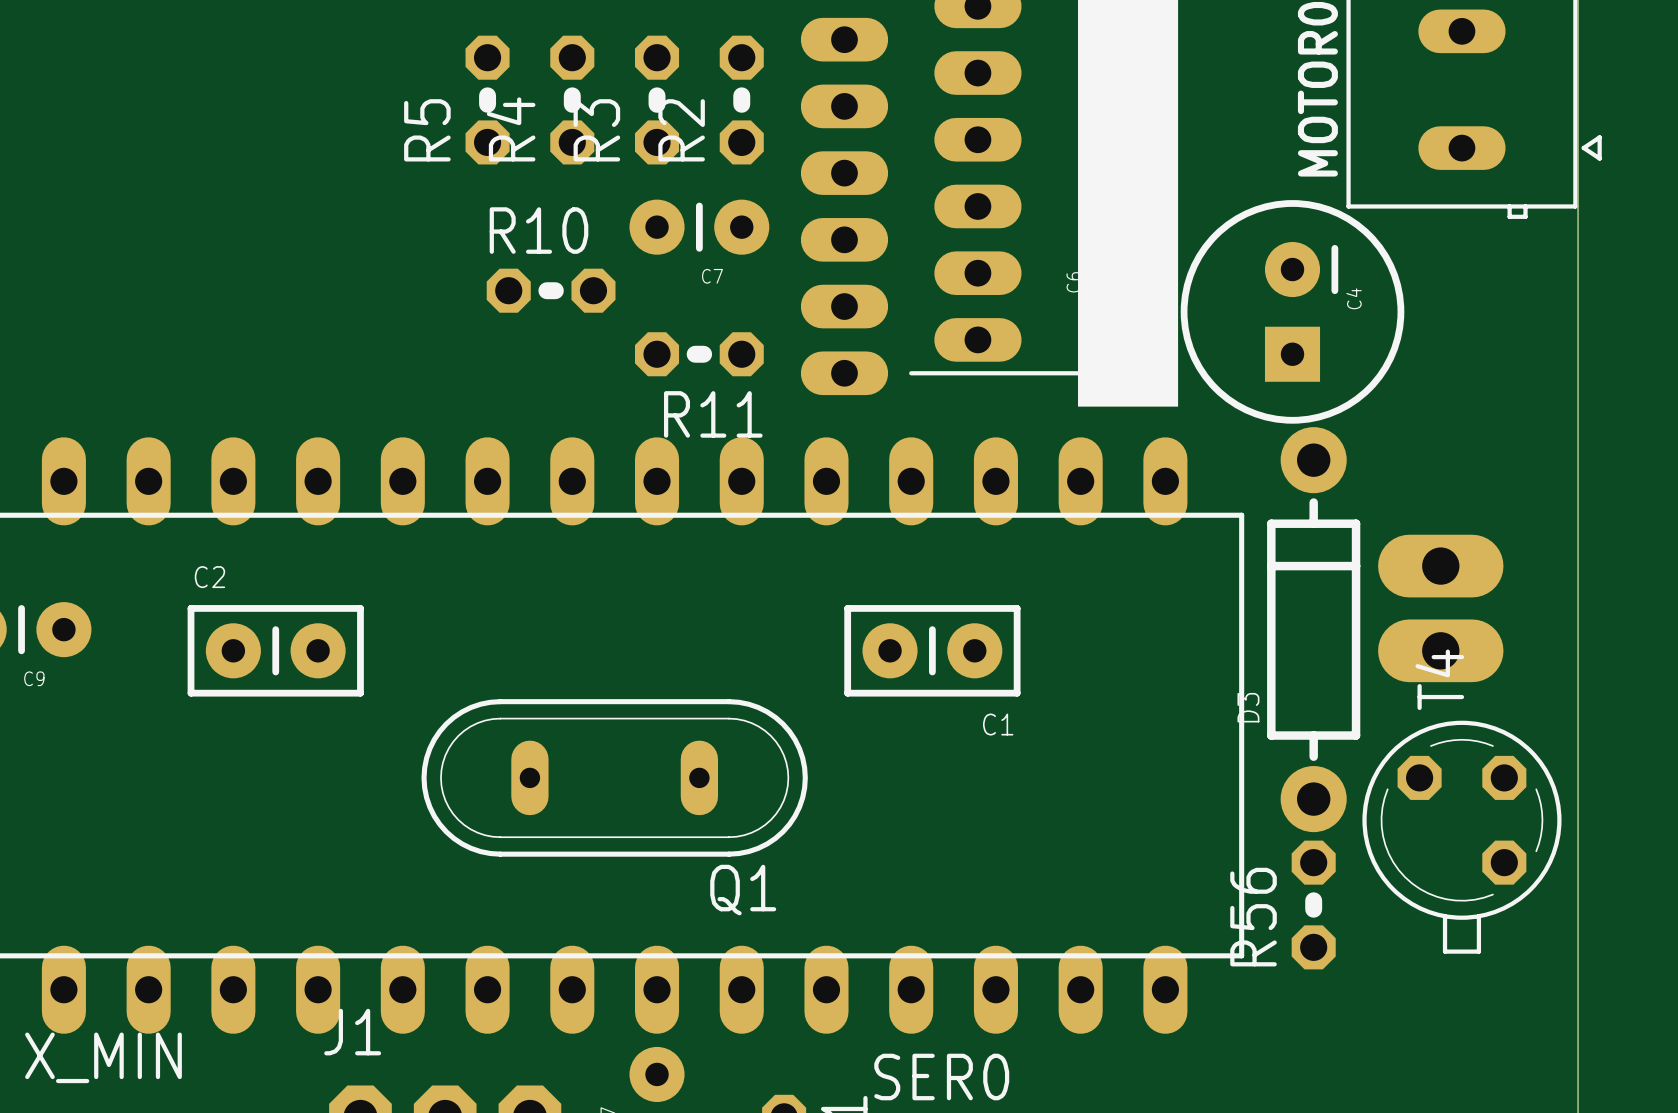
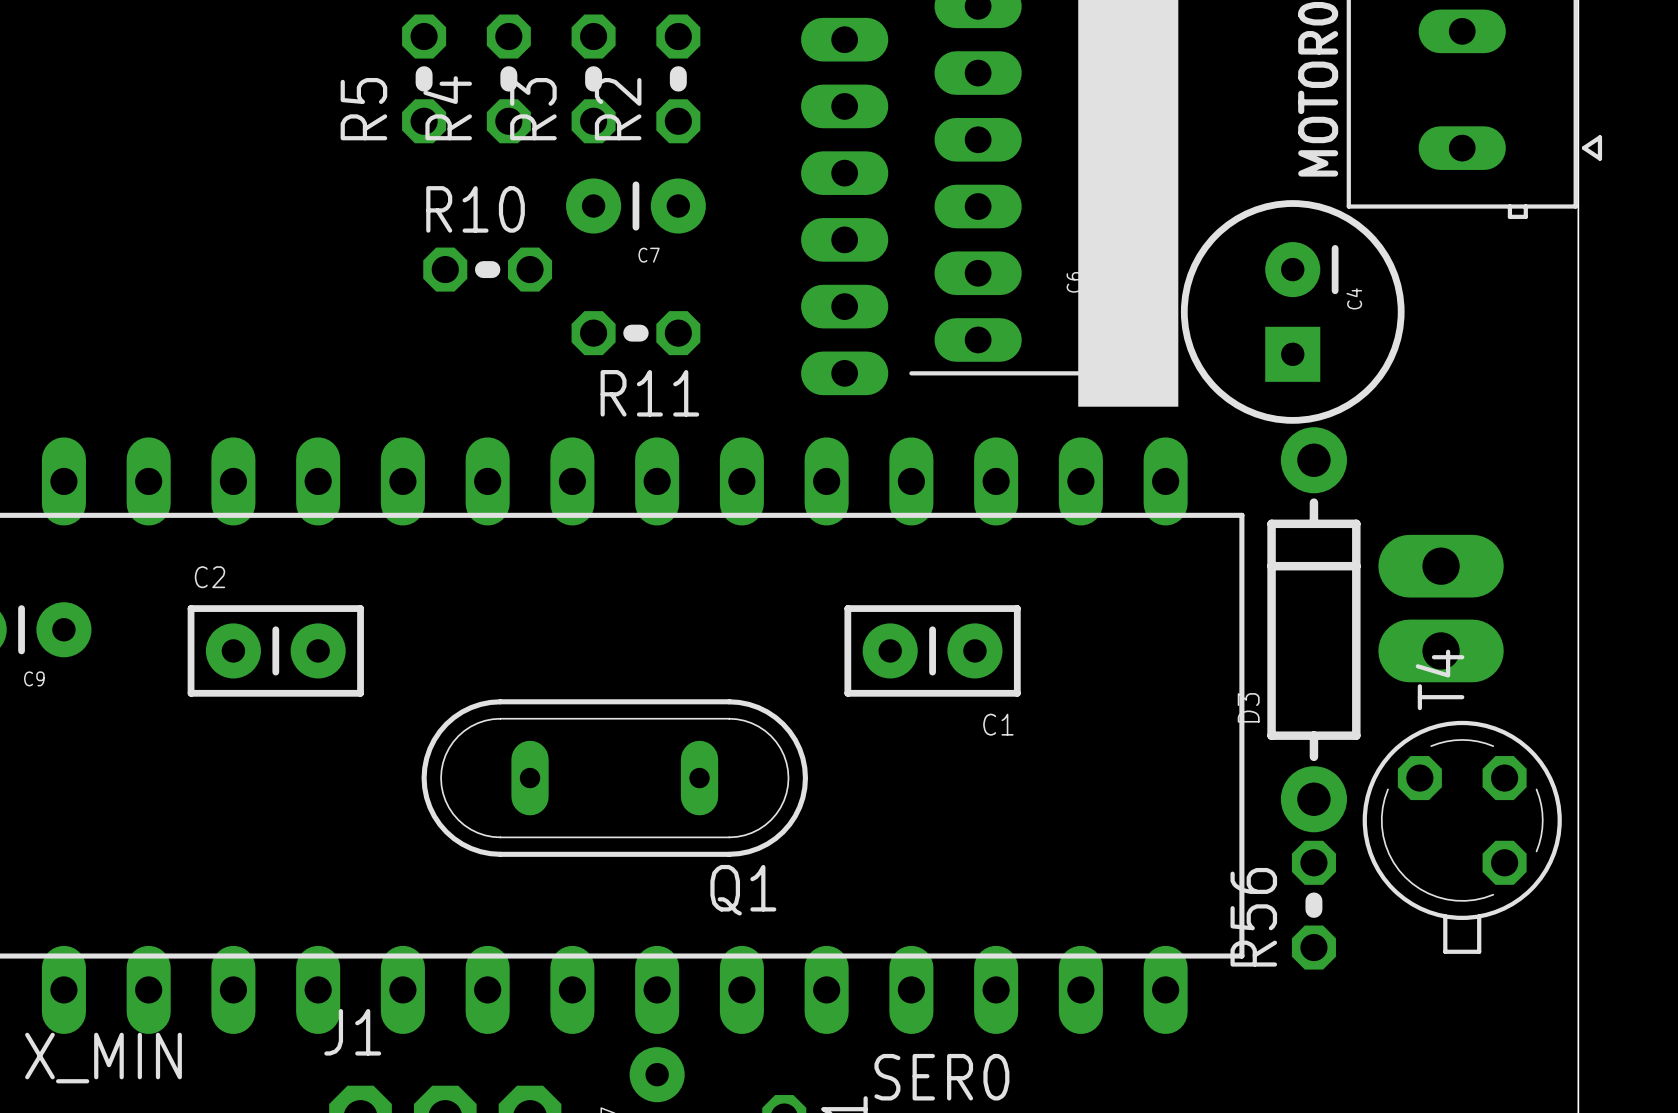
R5 position: (487, 100) -> (424, 78)
R4 position: (572, 100) -> (508, 78)
R3 position: (657, 100) -> (593, 78)
R2 position: (741, 100) -> (678, 78)
C7 position: (699, 227) -> (635, 206)
R10 position: (551, 290) -> (487, 269)
R11 position: (699, 354) -> (635, 333)

